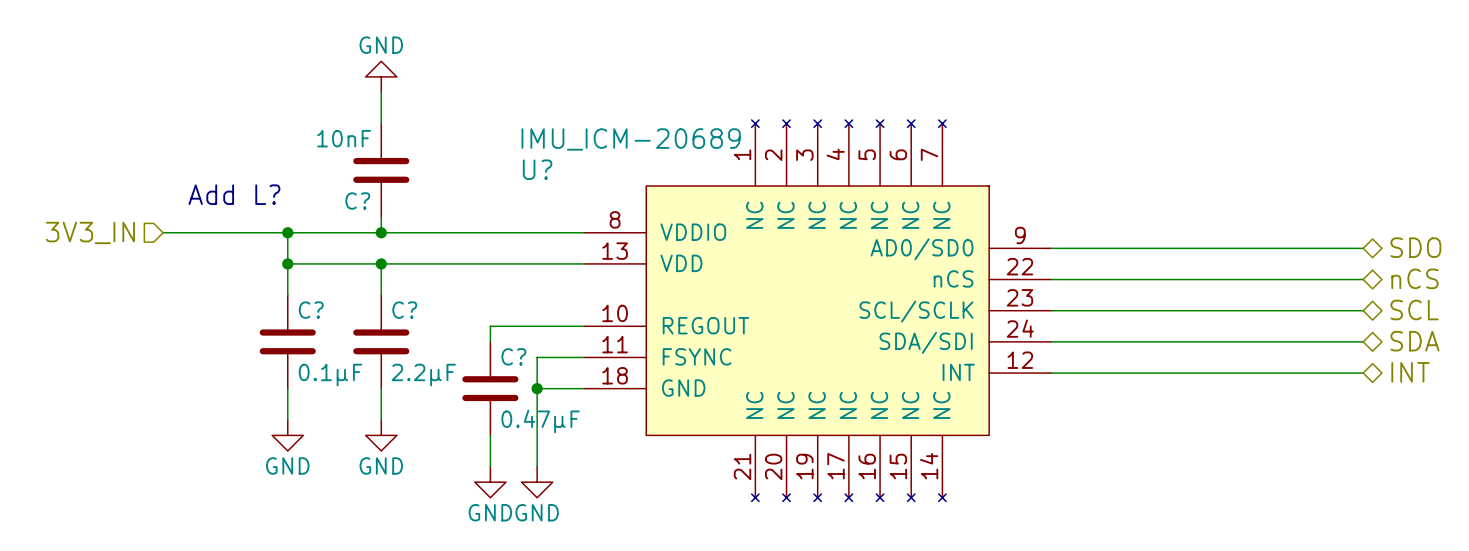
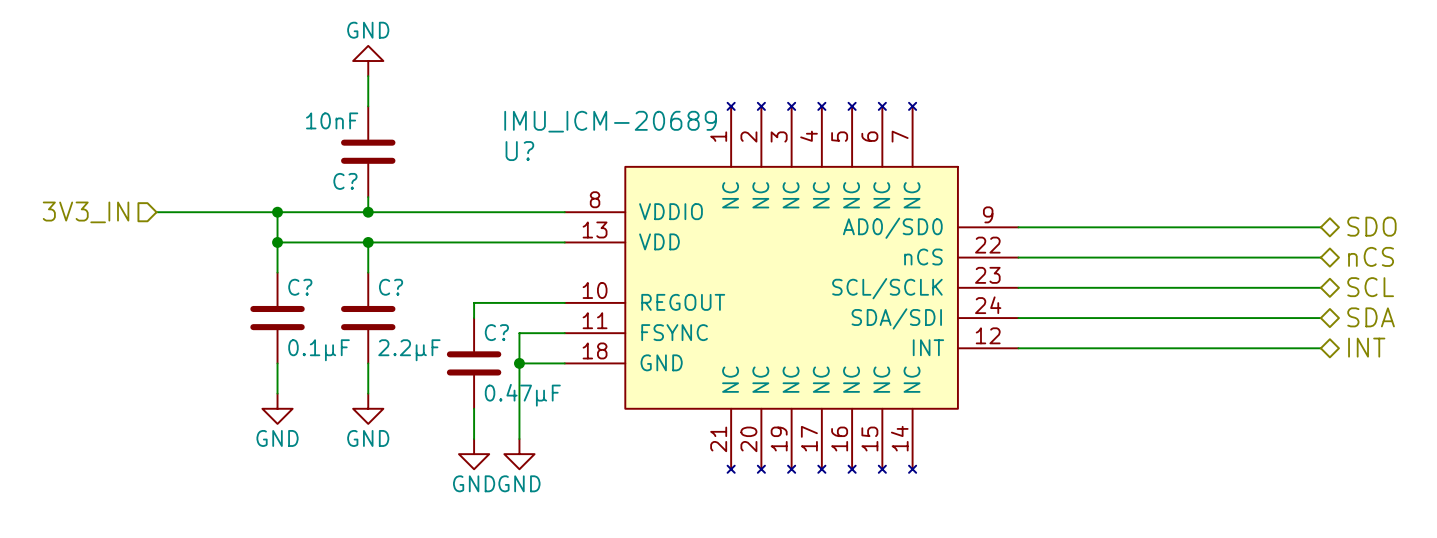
text: Add L? (234, 194) -> none

